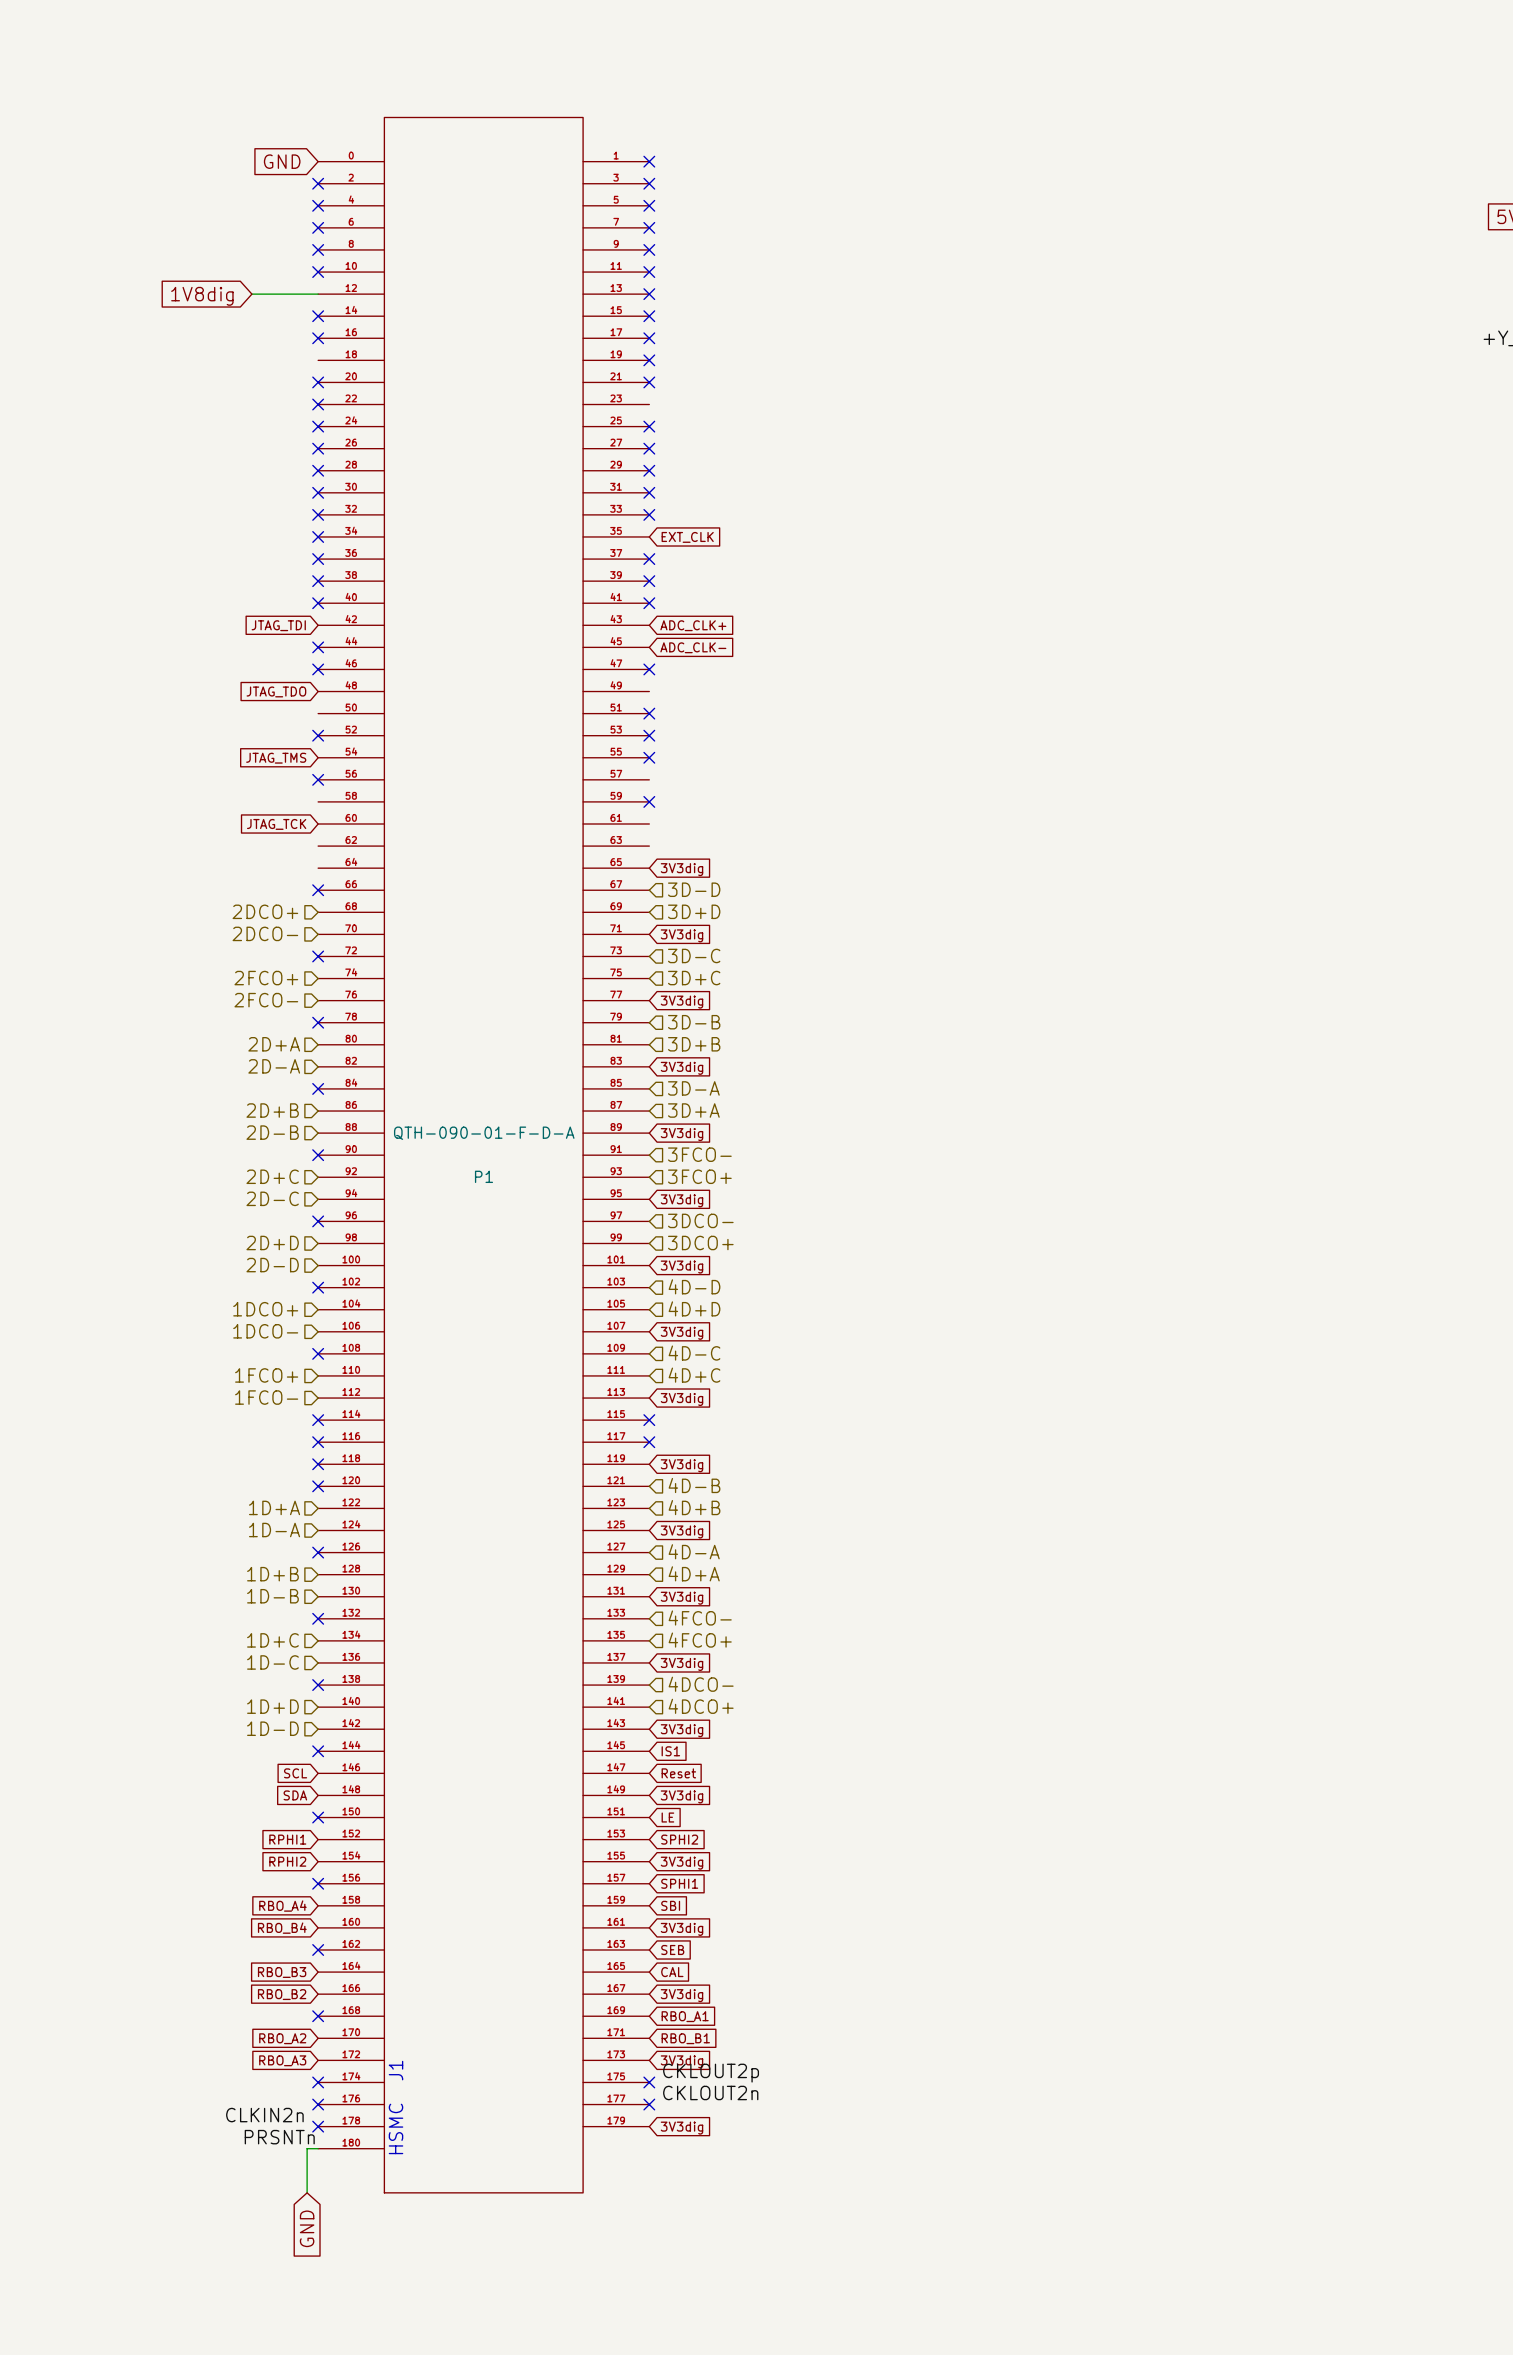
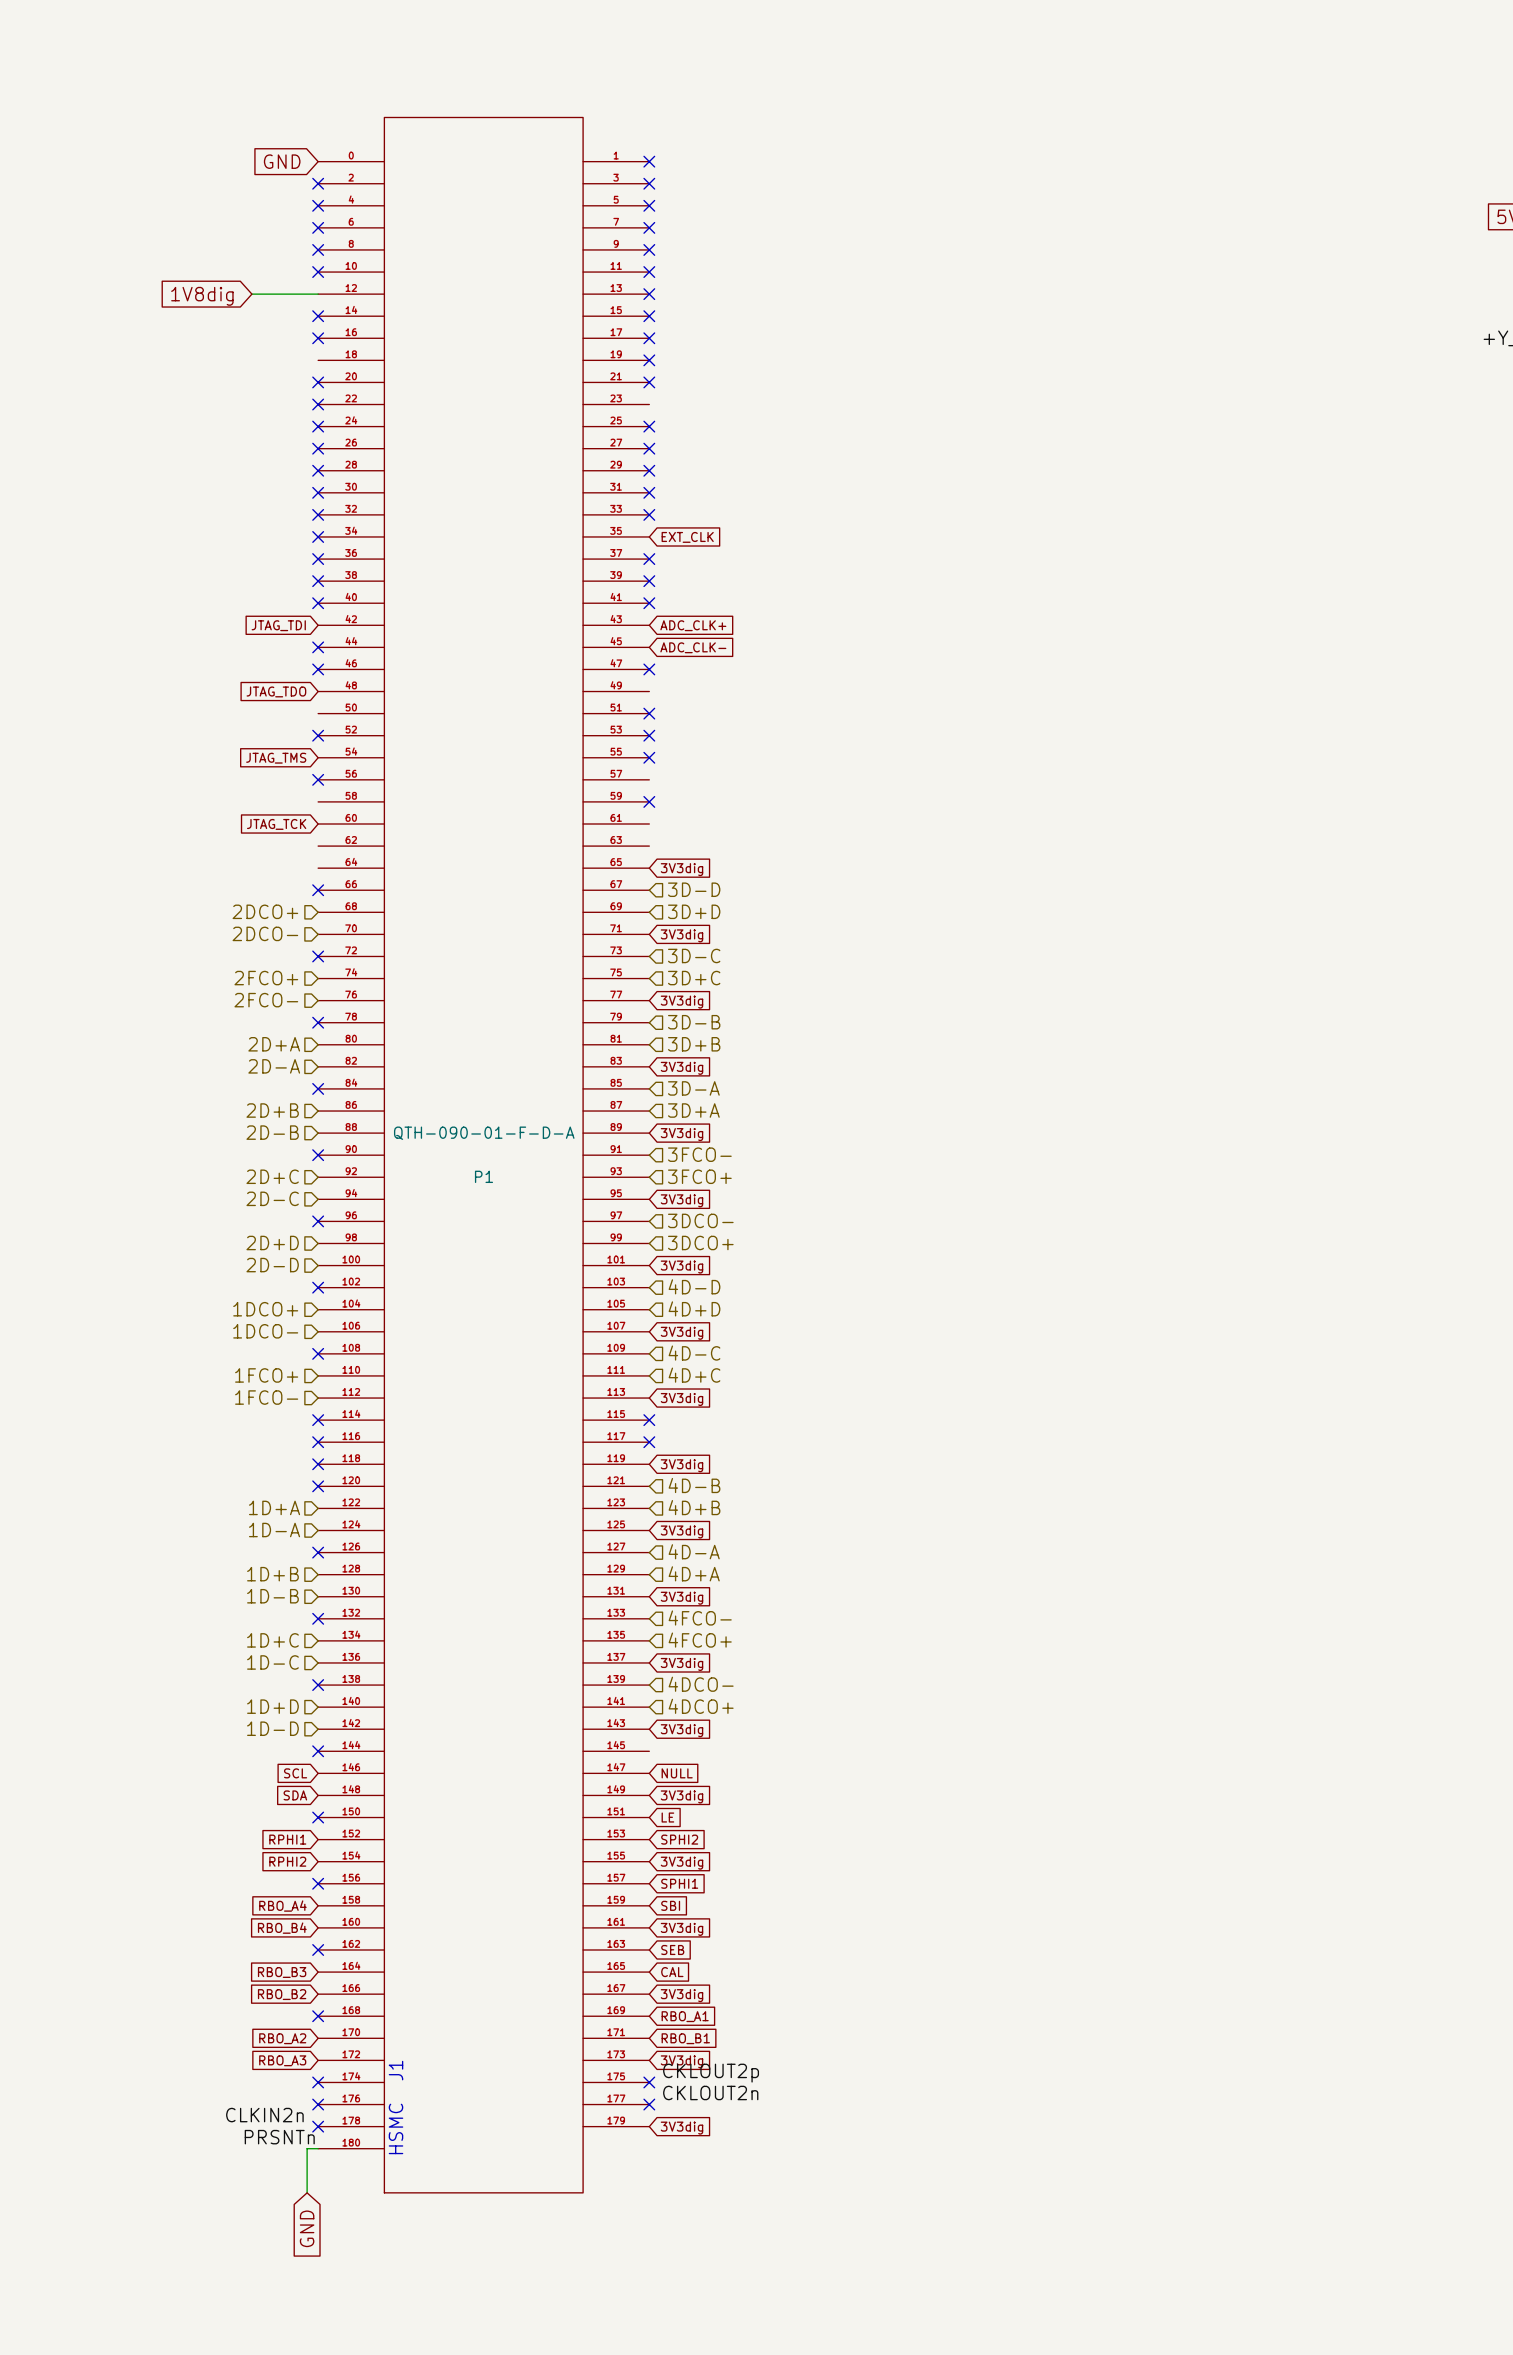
global label: IS1 (670, 1751) -> none
global label: Reset (678, 1773) -> NULL (677, 1773)

